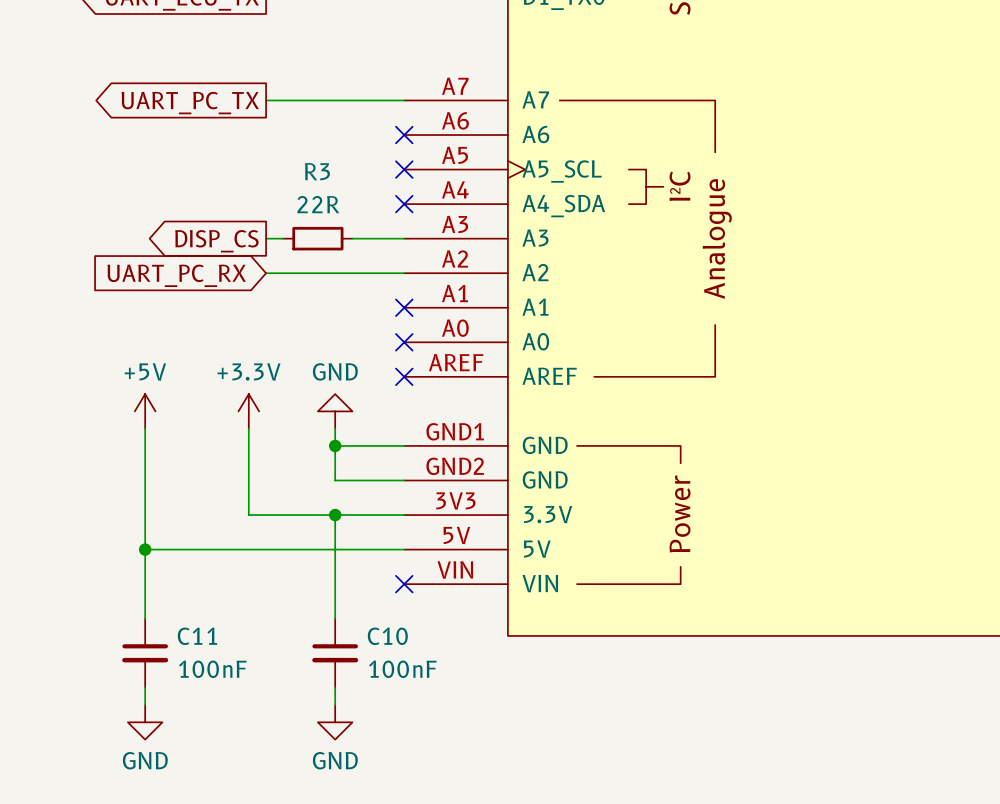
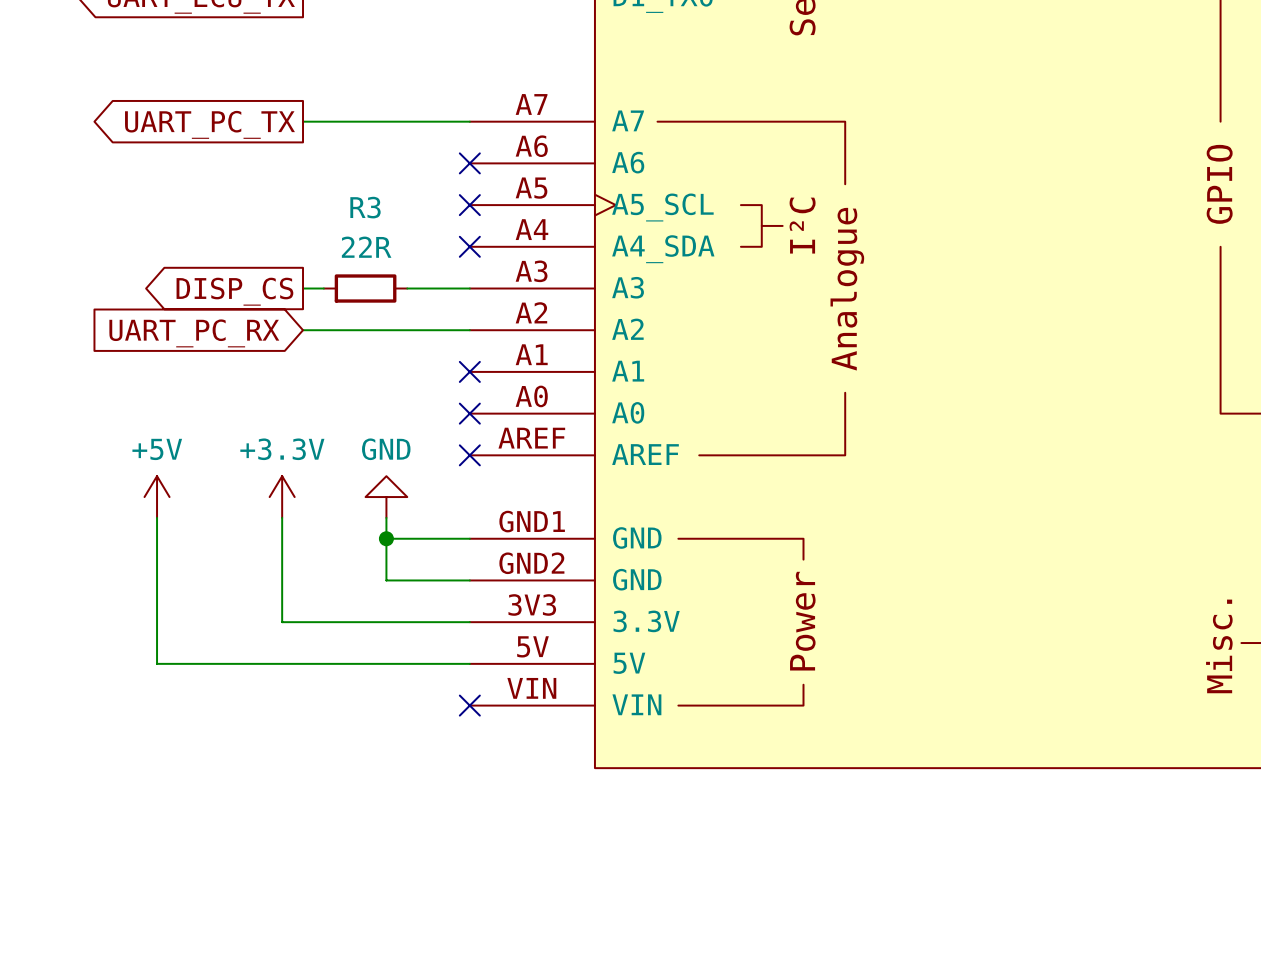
wire: (335, 515) (335, 618) -> none
junction: (335, 515) -> none
wire: (145, 549) (145, 618) -> none
junction: (145, 549) -> none
C11: 100nF (145, 653) -> none
C10: 100nF (335, 653) -> none
wire: (145, 687) (145, 705) -> none
wire: (335, 687) (335, 705) -> none
power symbol: GND (145, 722) -> none
power symbol: GND (335, 722) -> none

